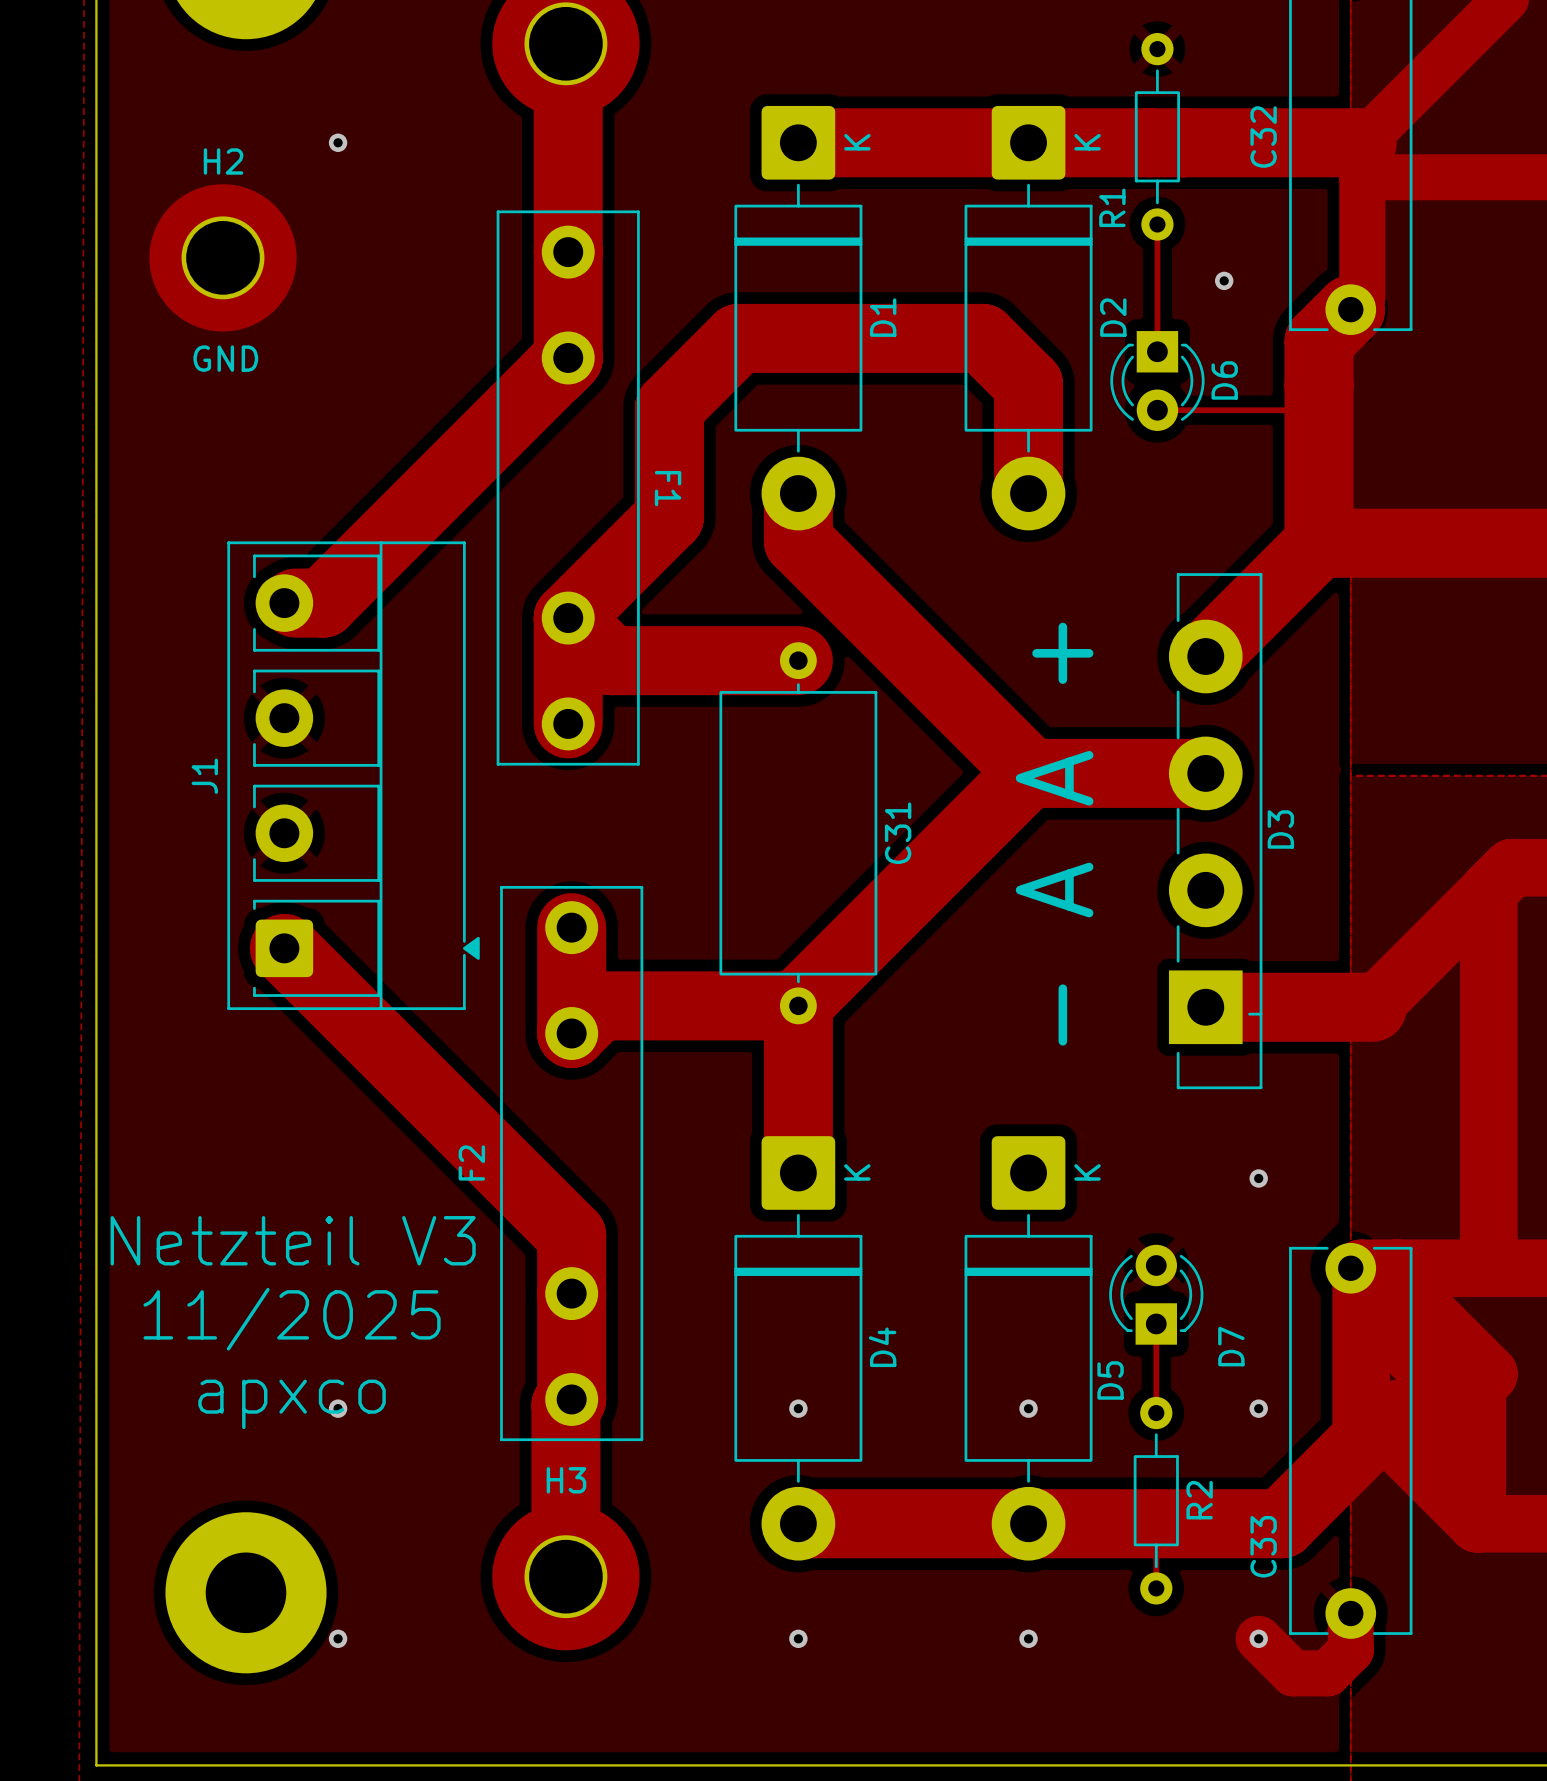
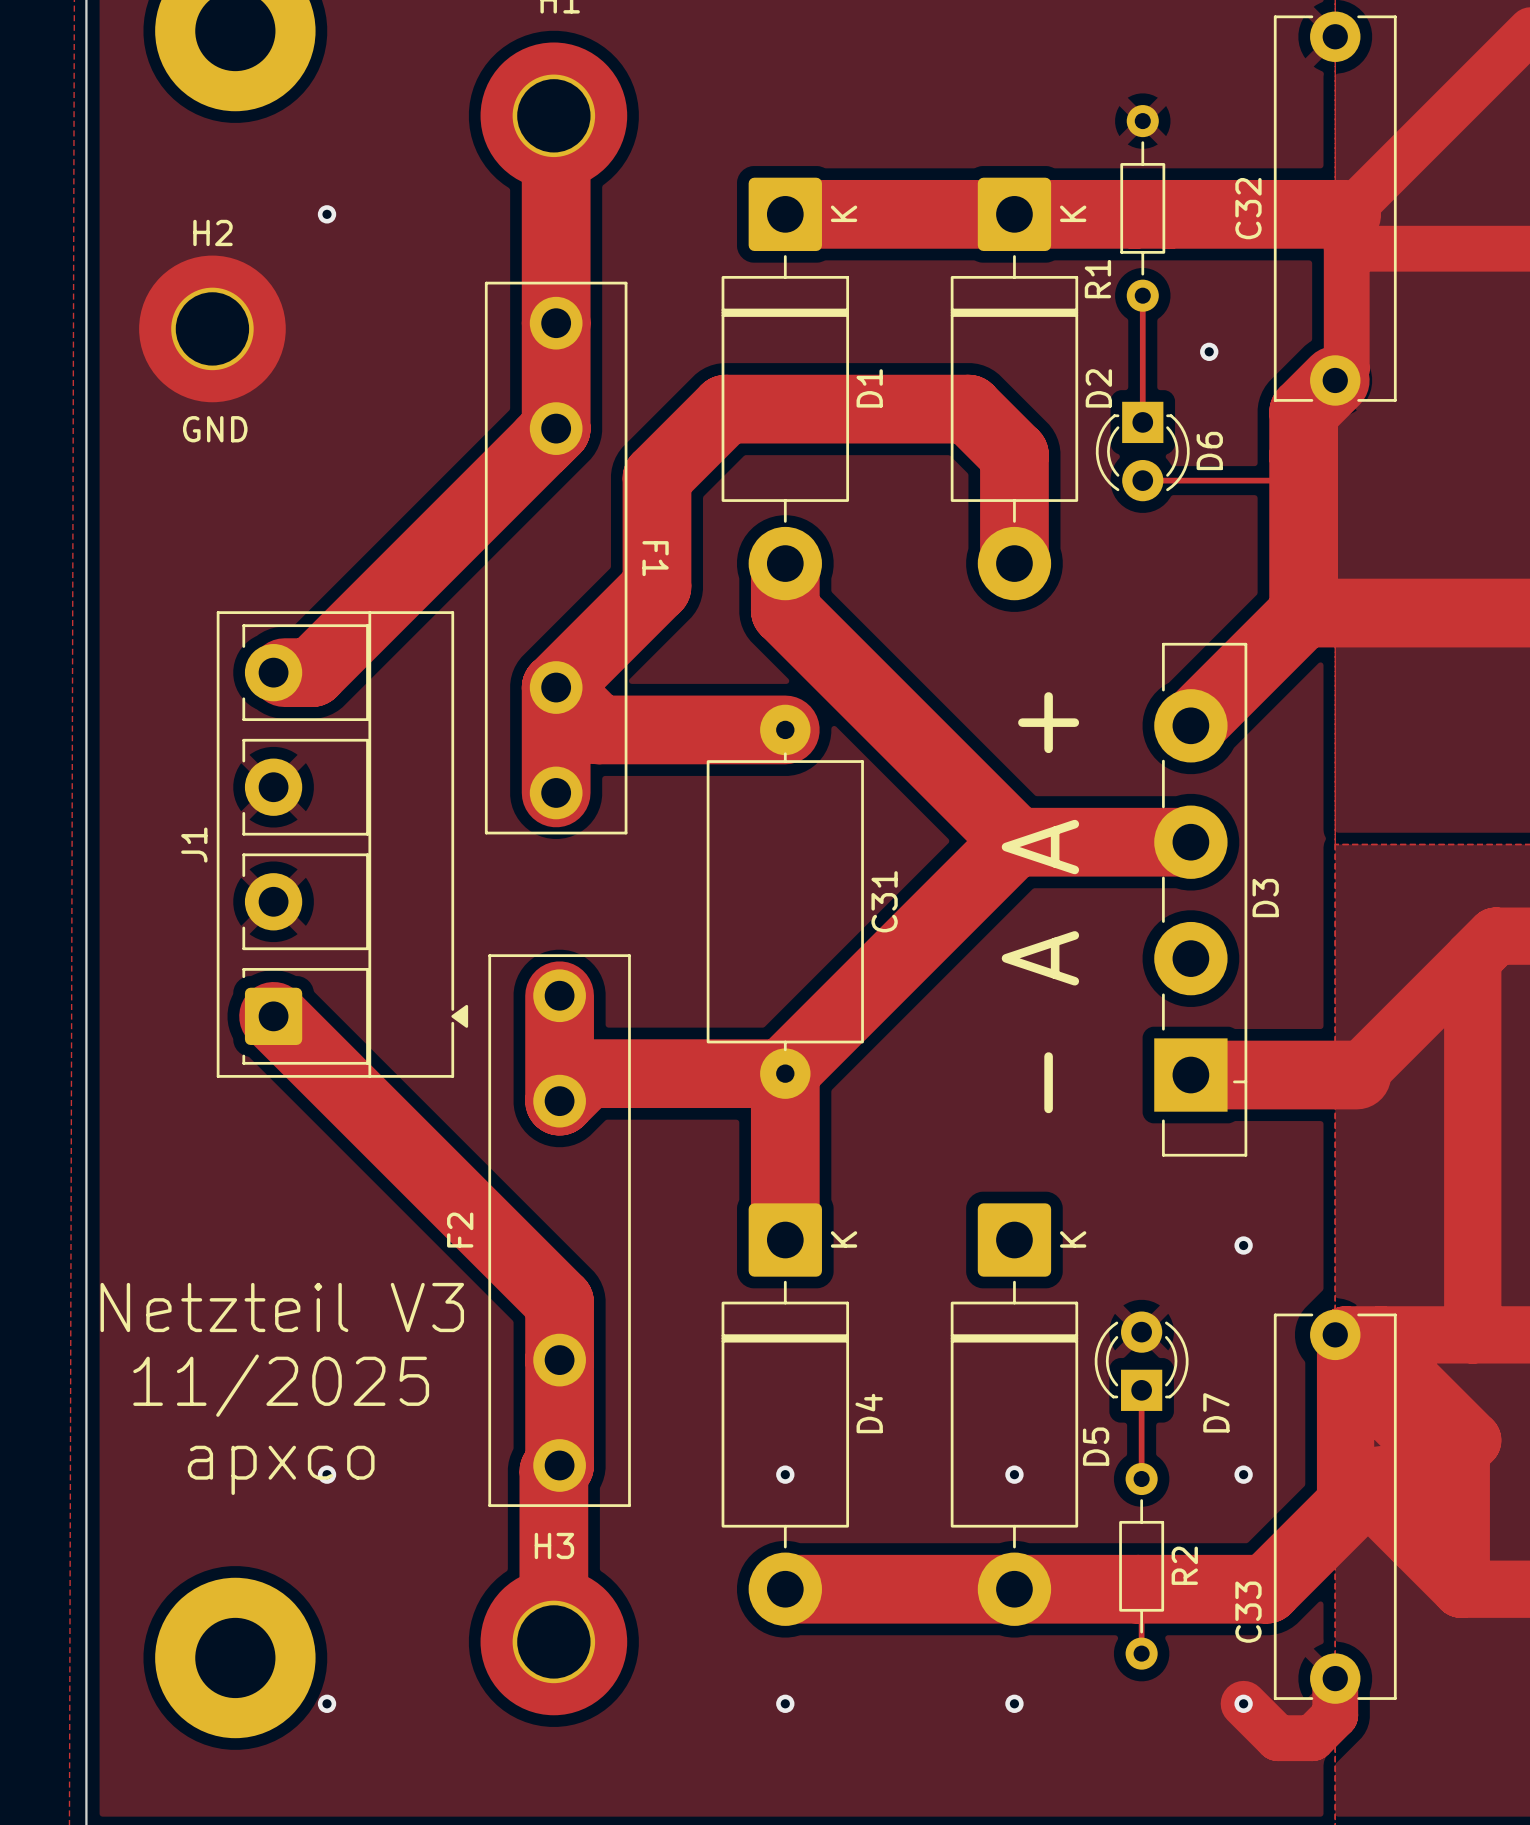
C31 footprint: [719, 642, 878, 1025] -> [706, 704, 864, 1099]

